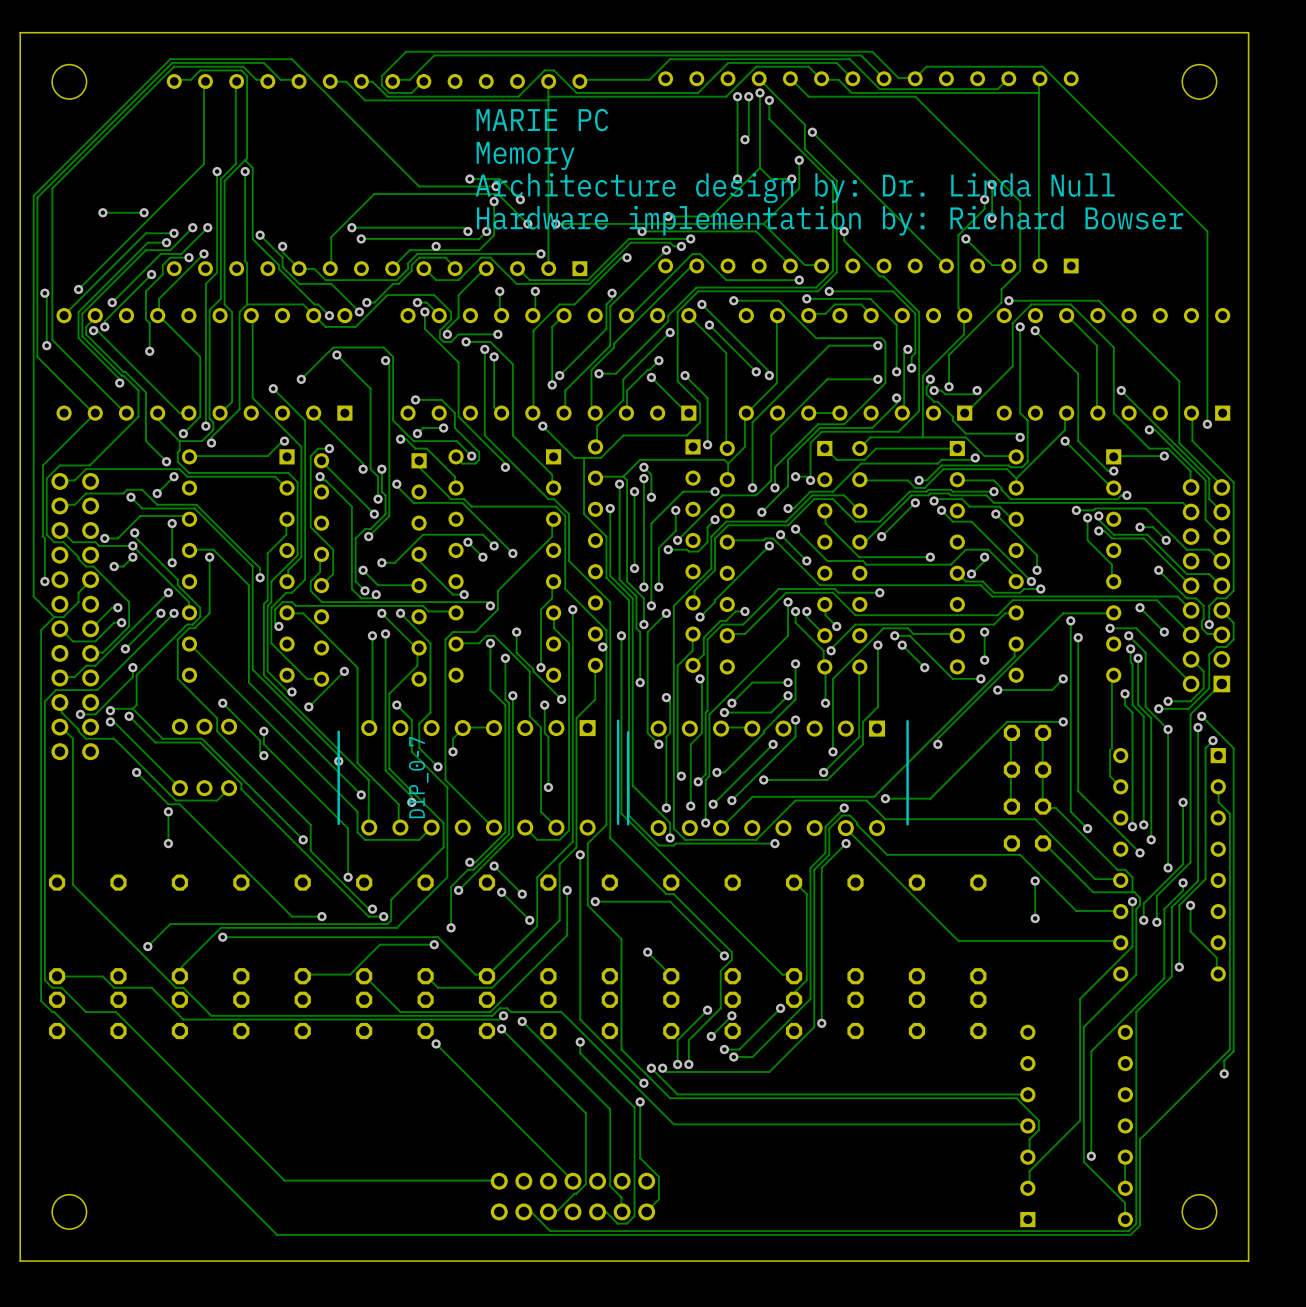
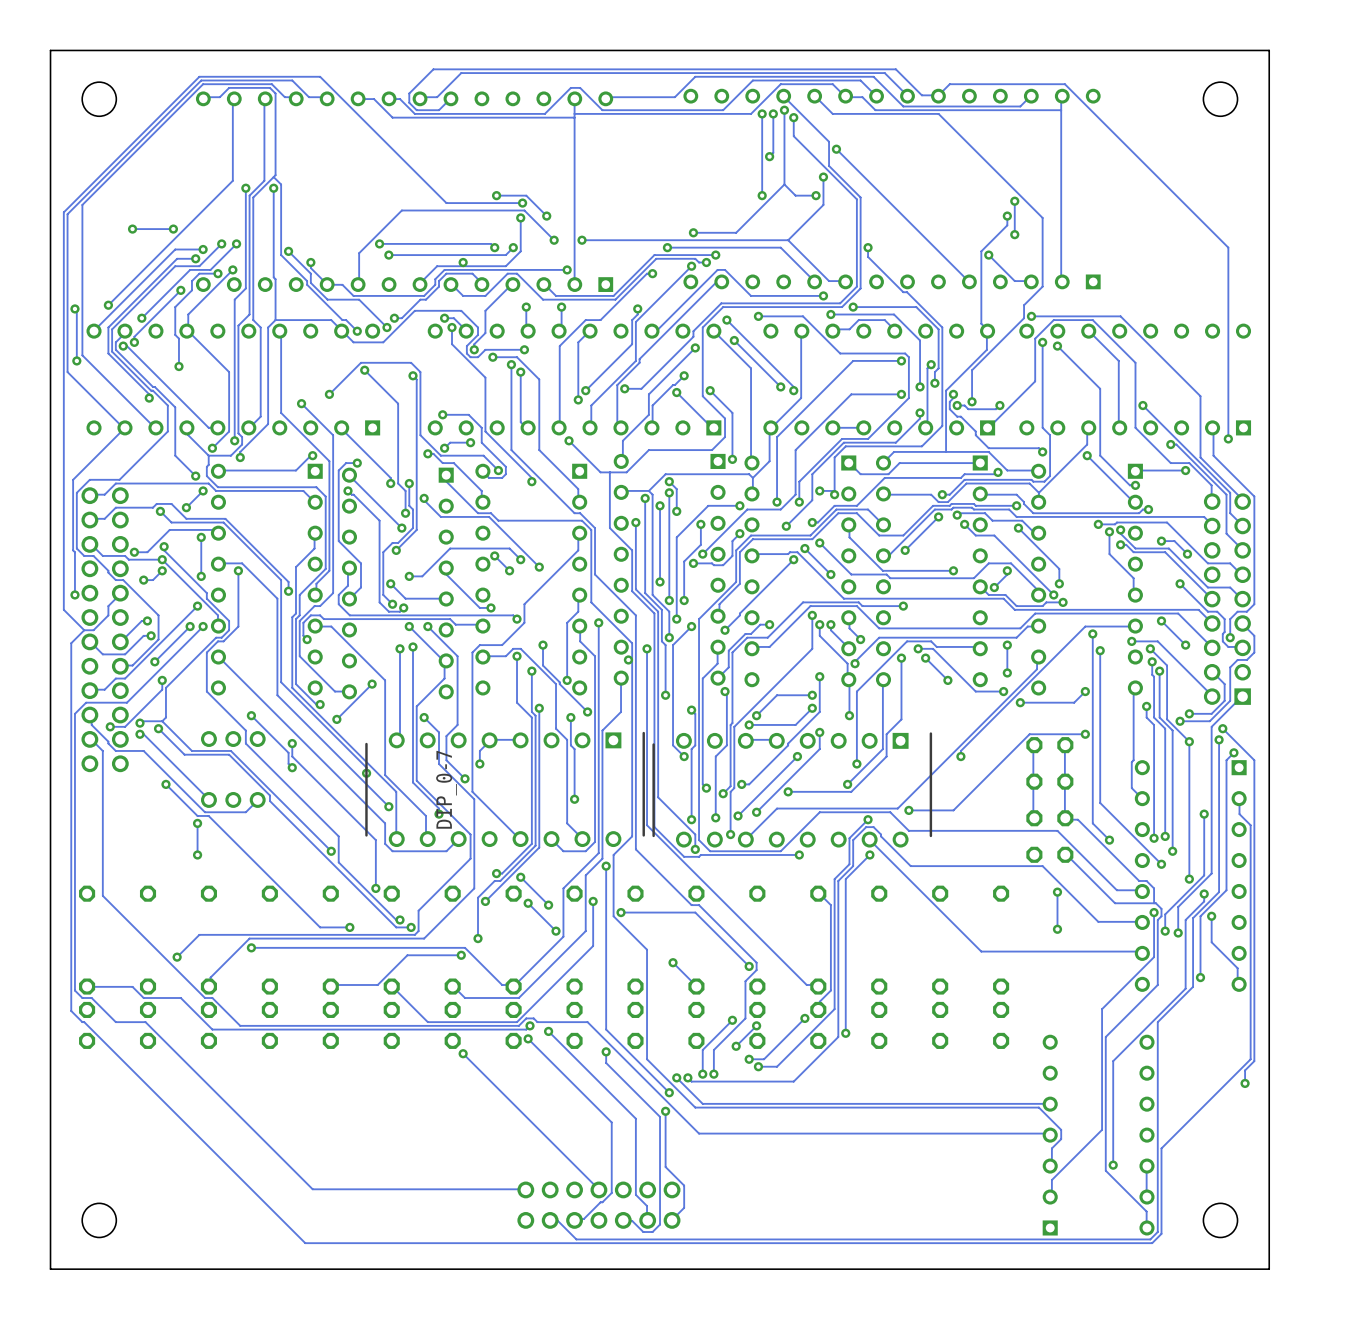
text: MARIE PC (542, 120) -> none
text: Memory (525, 155) -> none
text: Architecture design by: Dr. Linda Null (795, 188) -> none
text: Hardware implementation by: Richard Bowser (830, 220) -> none

